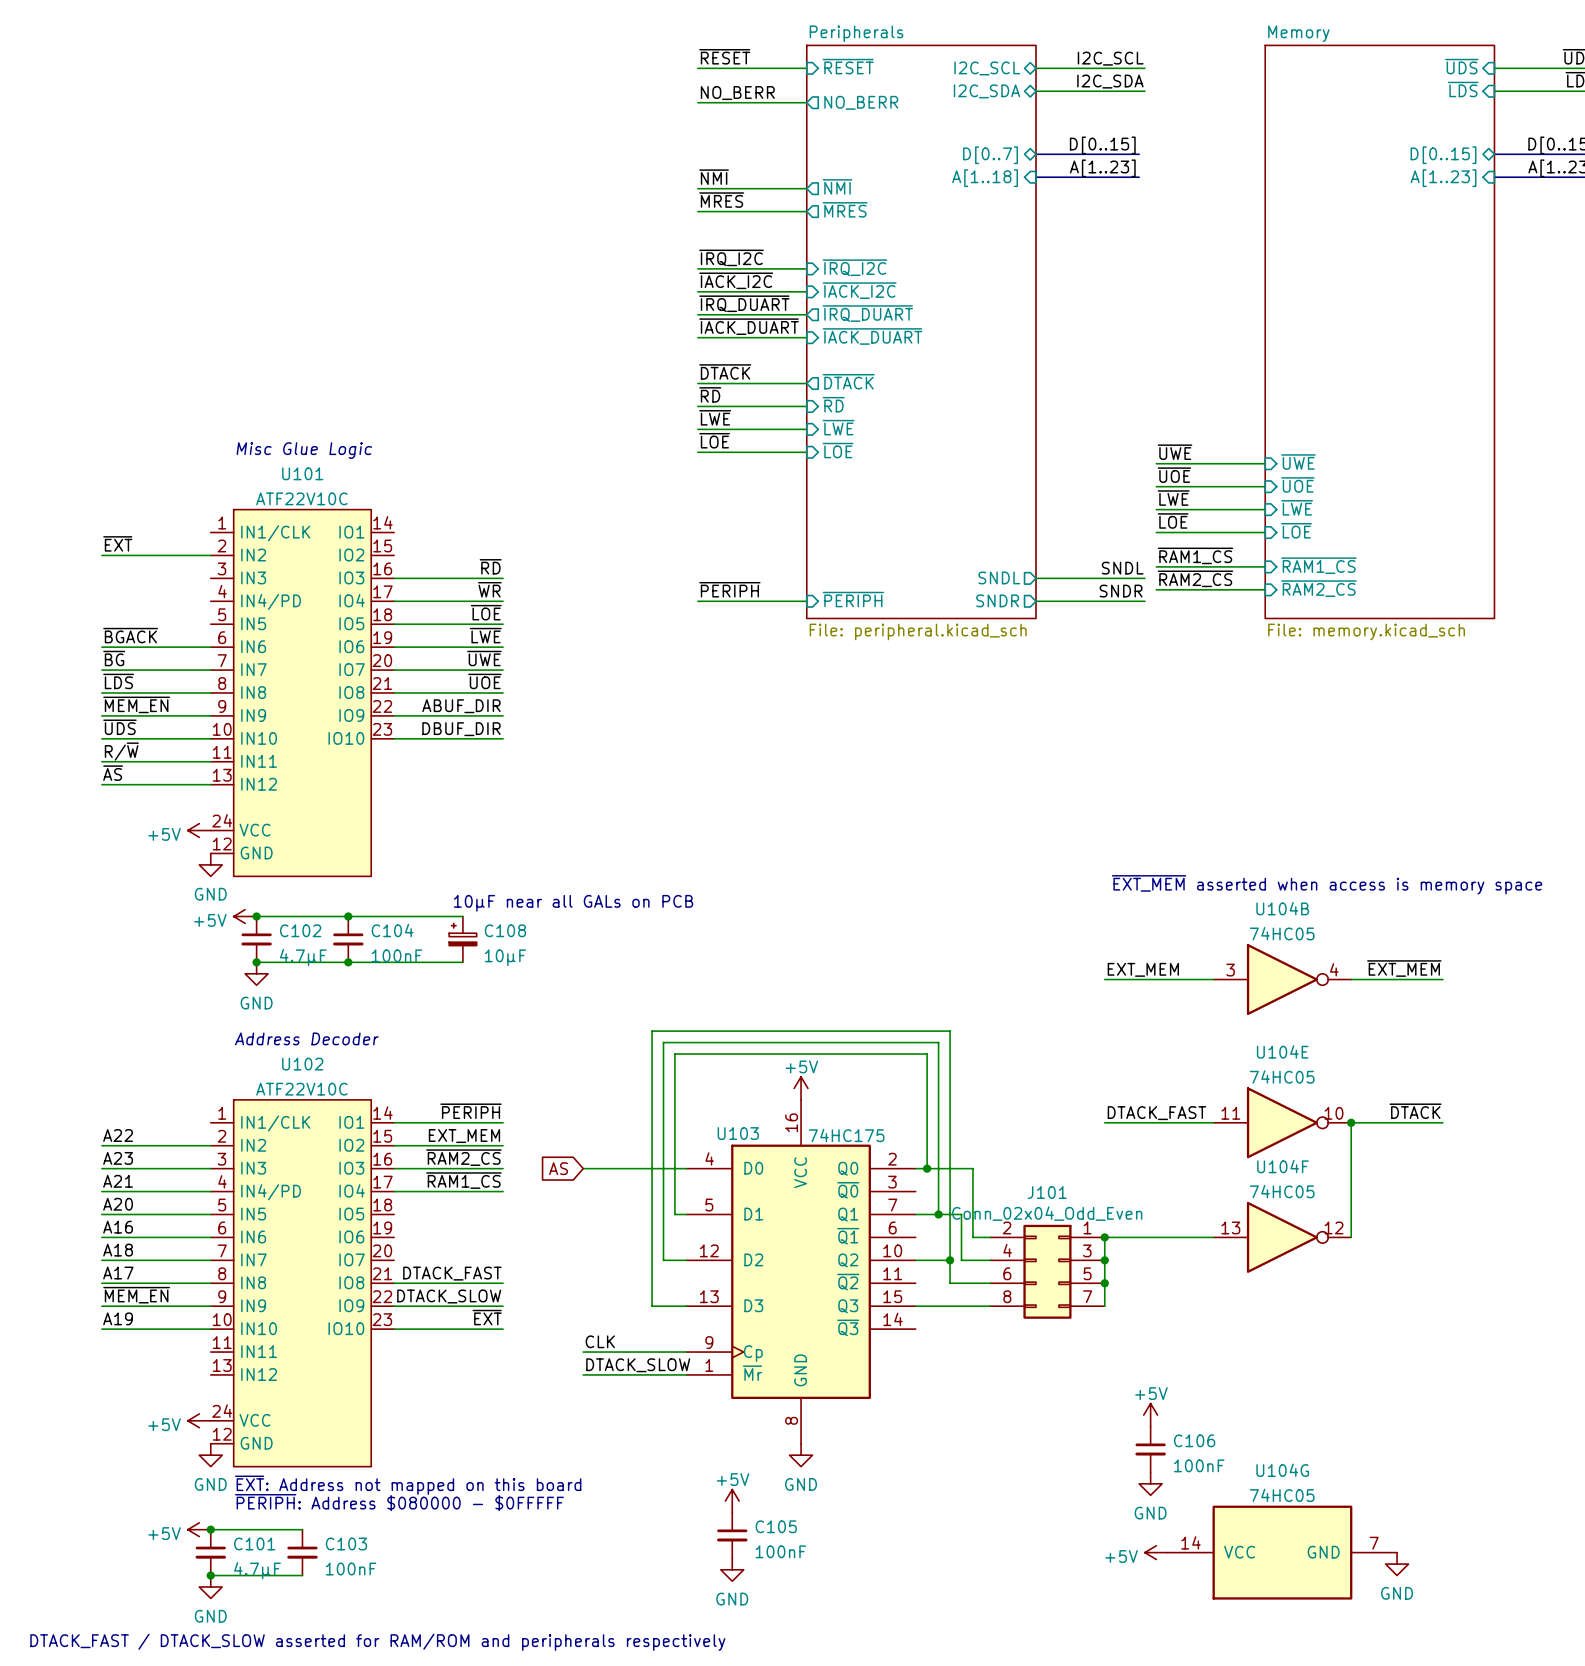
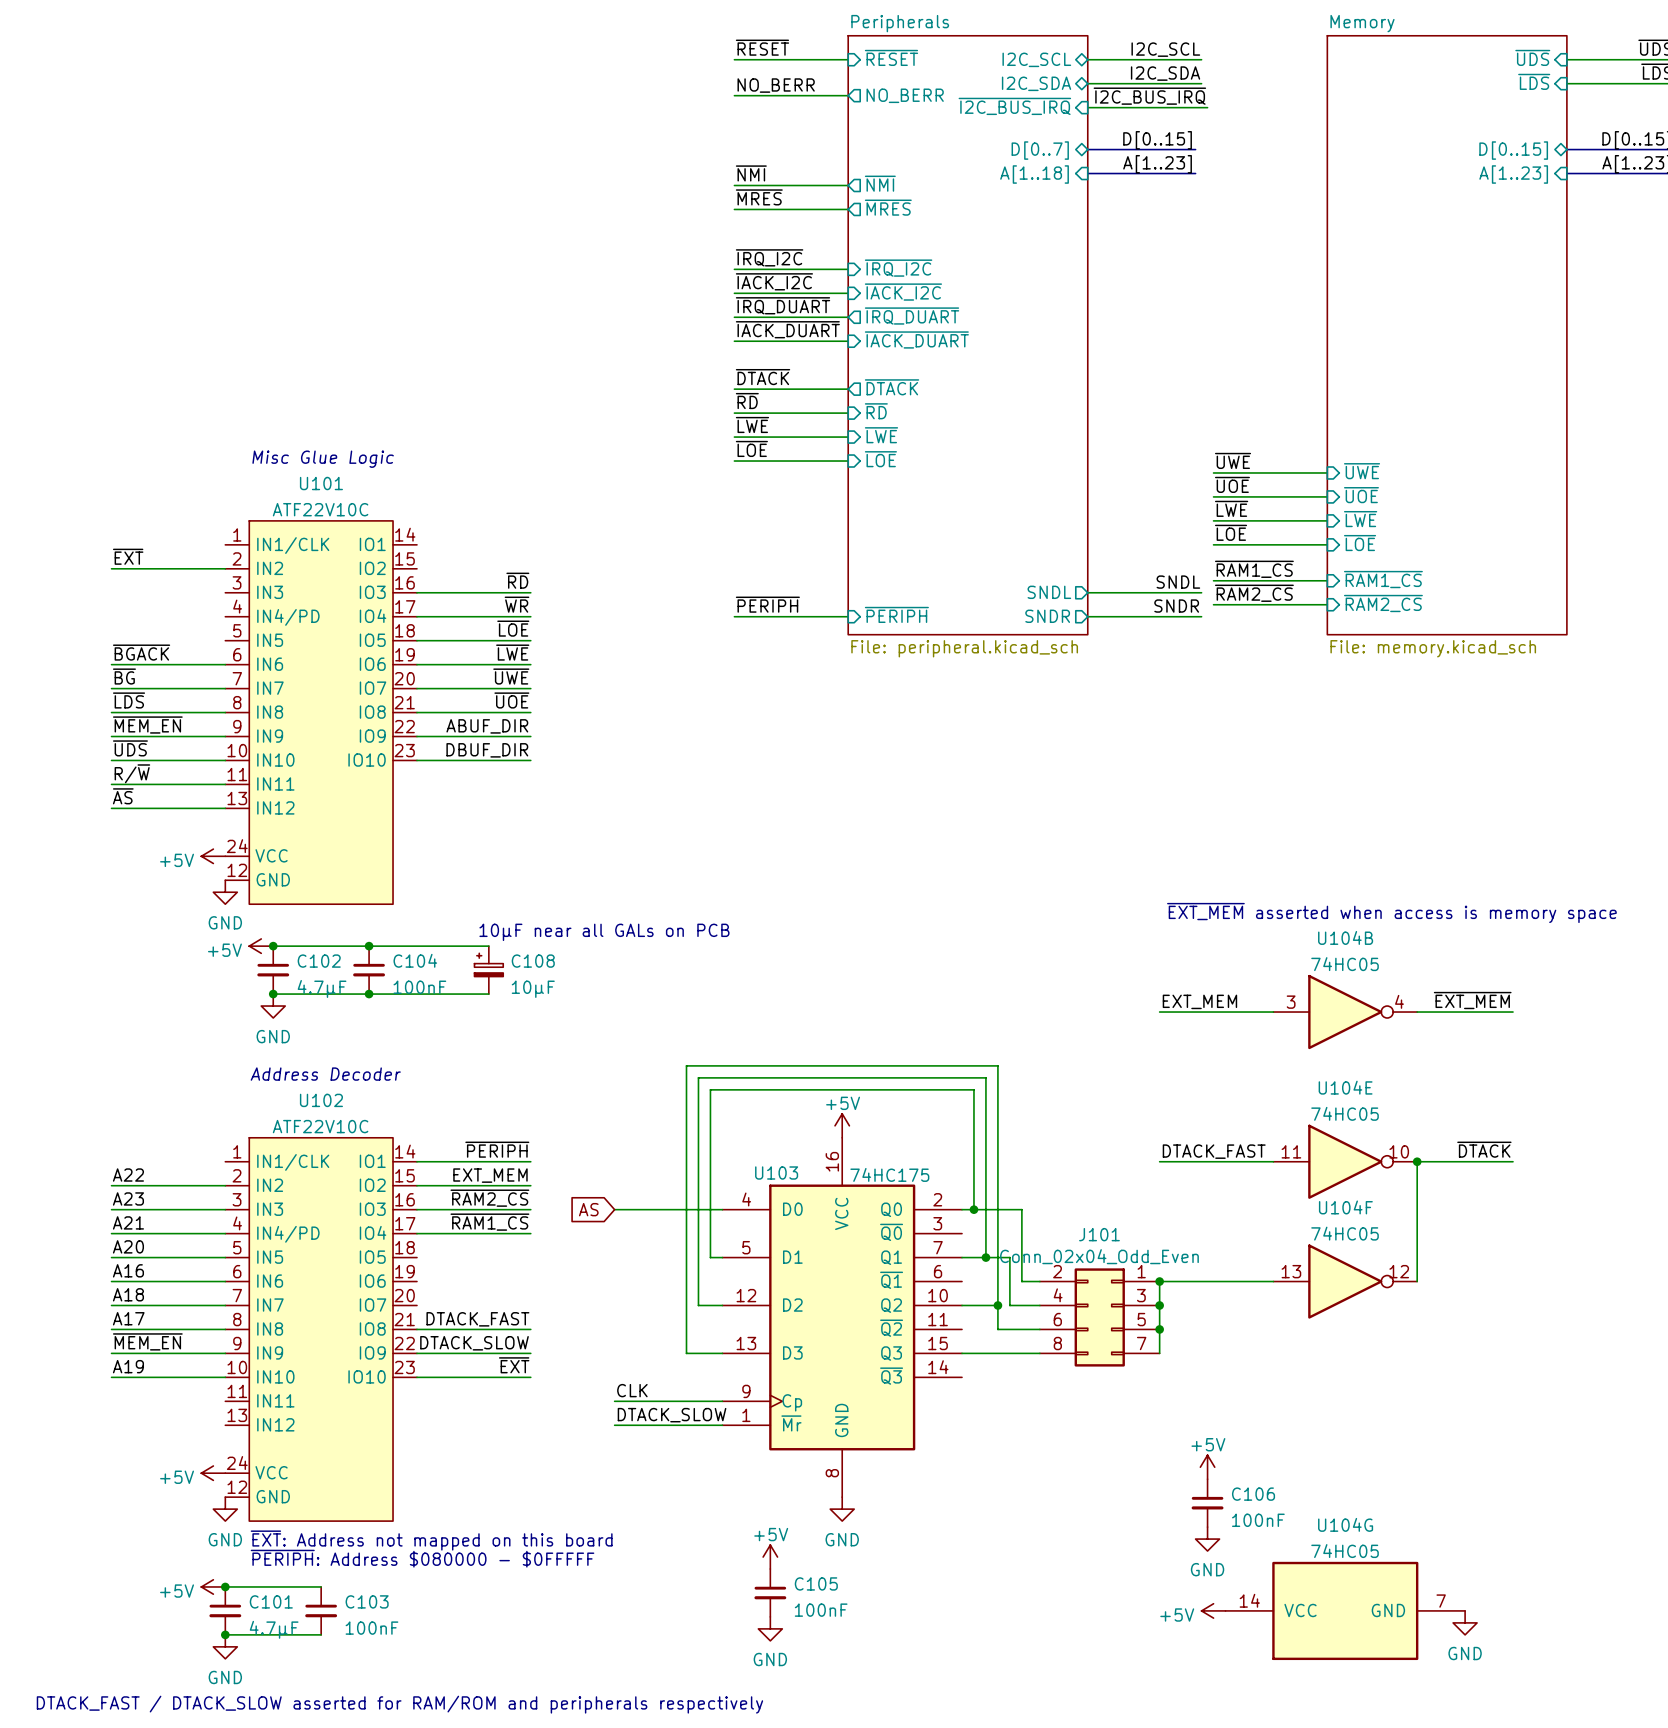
label: none -> ~{I2C_BUS_IRQ} (1149, 96)
sheet pin: none -> ~{I2C_BUS_IRQ} (1014, 106)
wire: none -> (1087, 107) (1207, 107)

